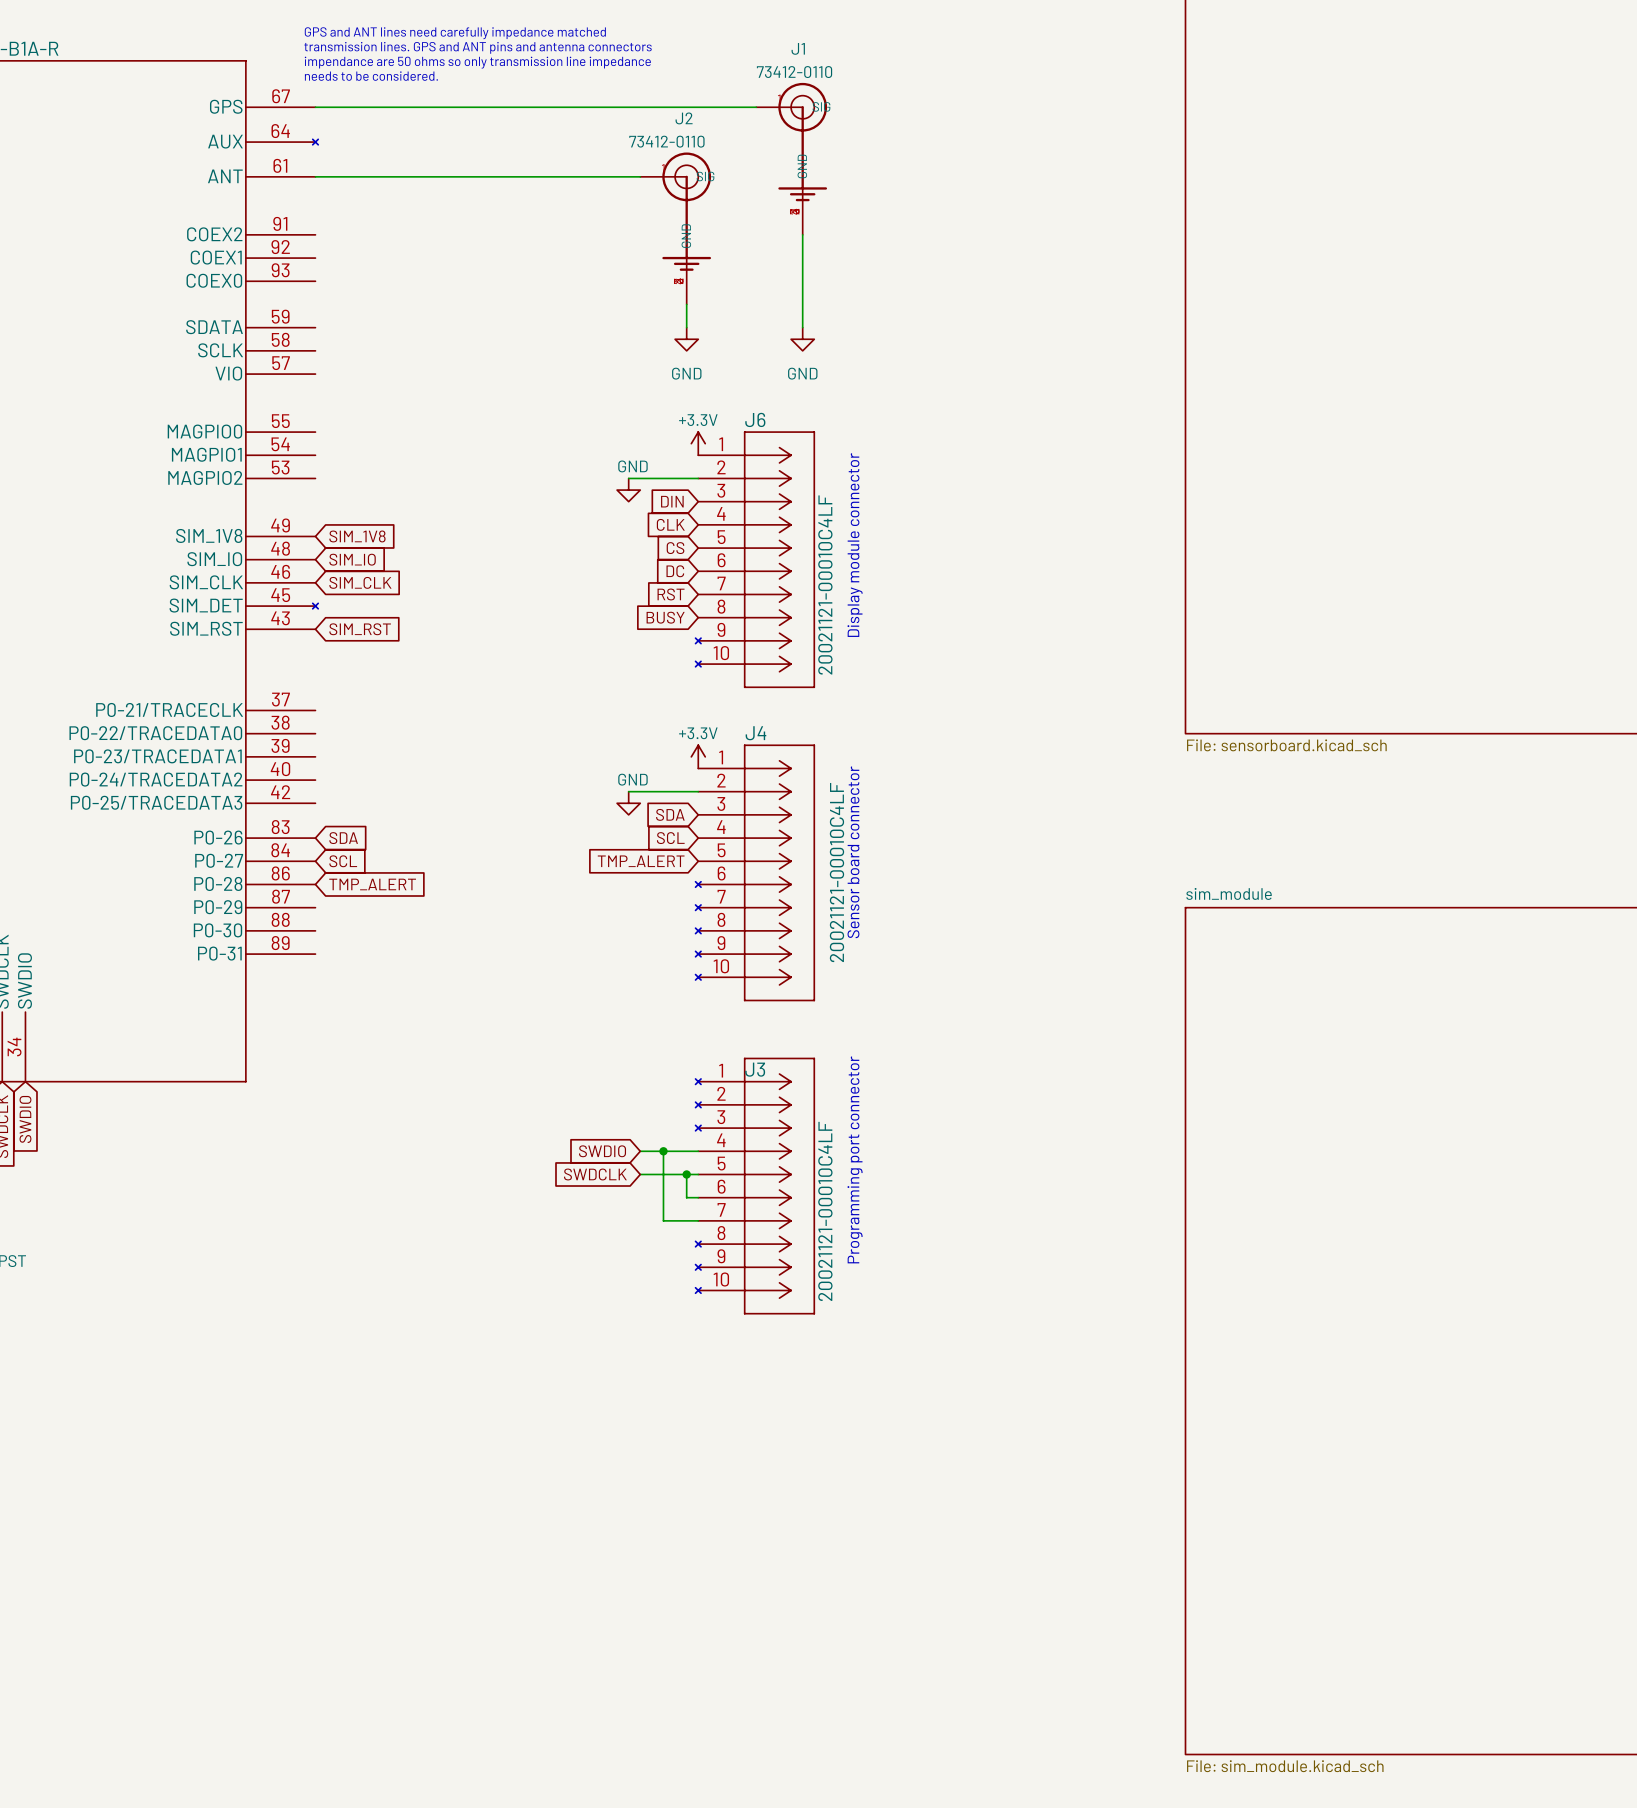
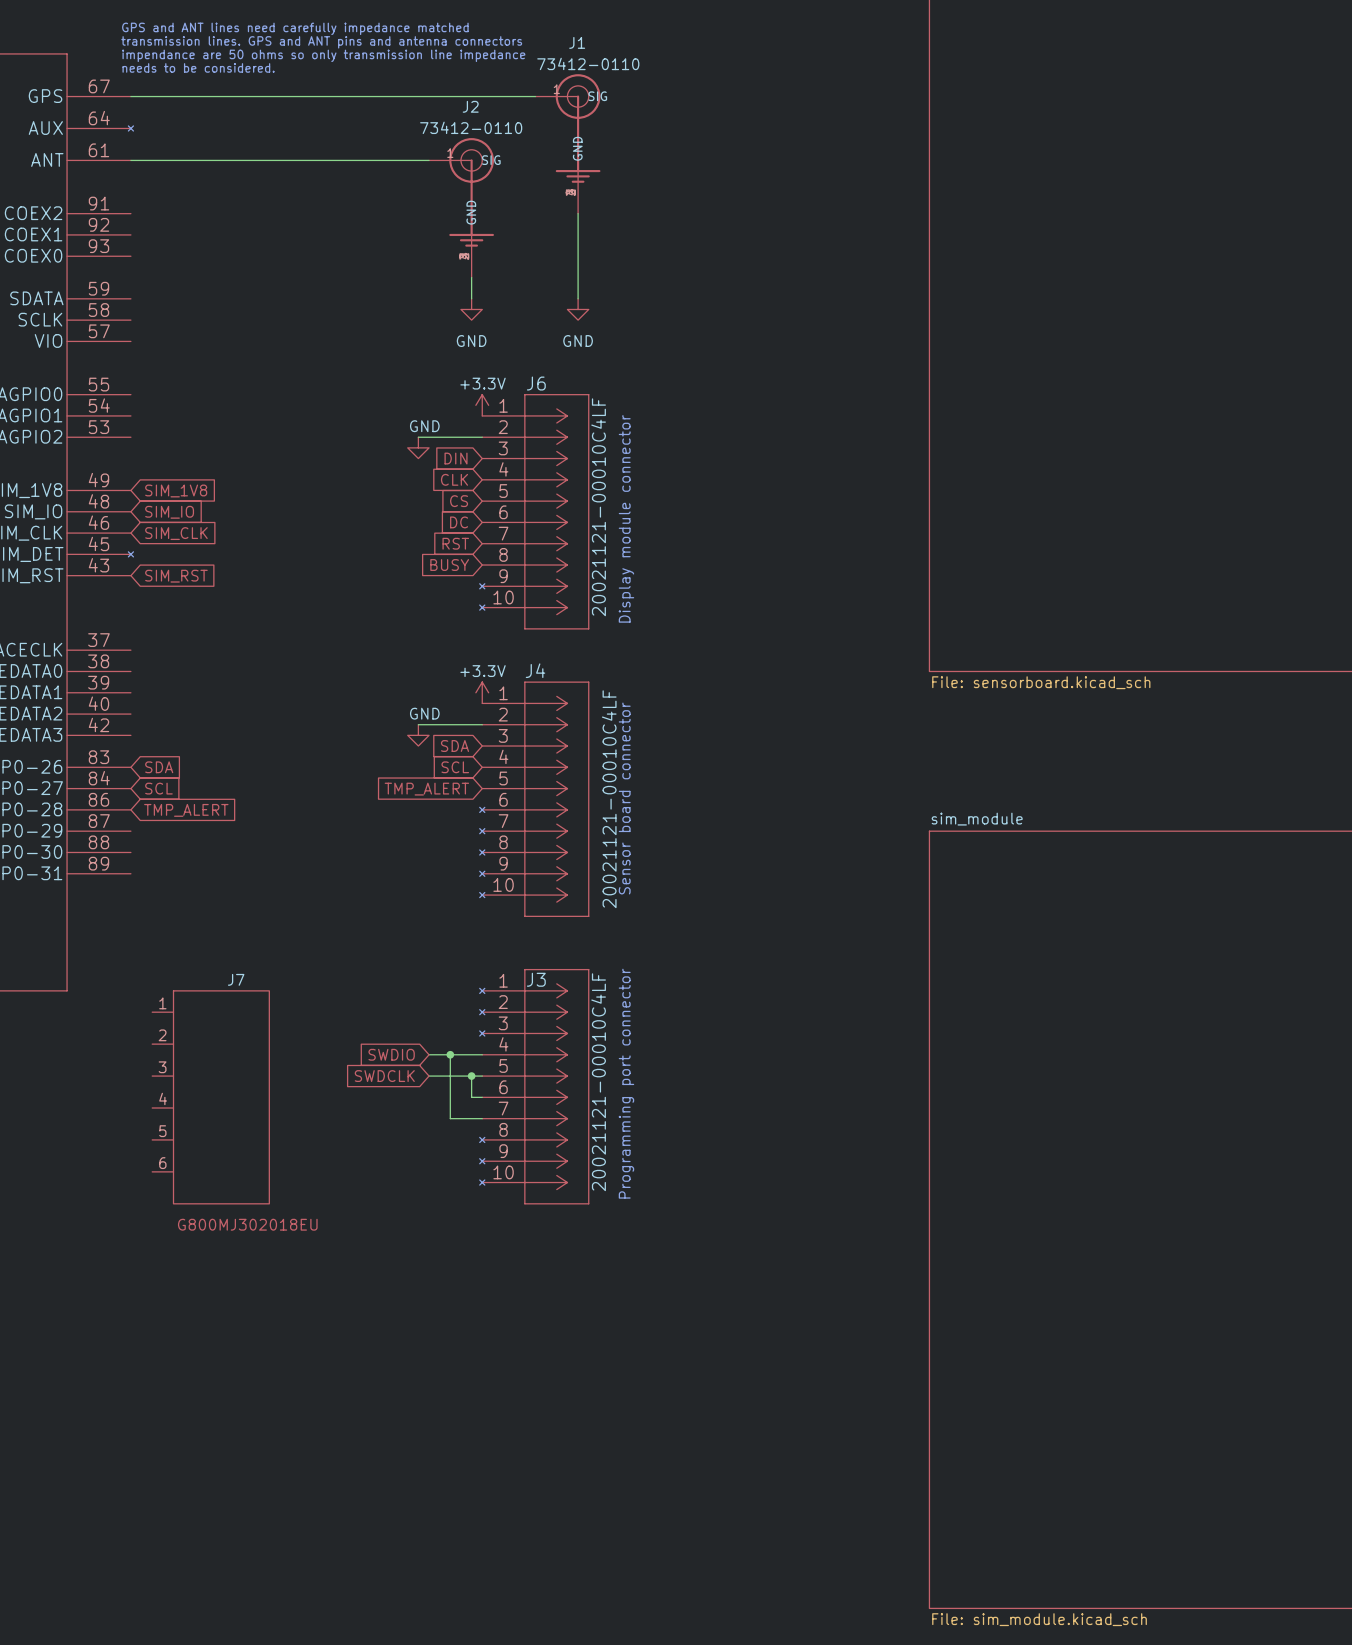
J7: none -> (210, 1097)

